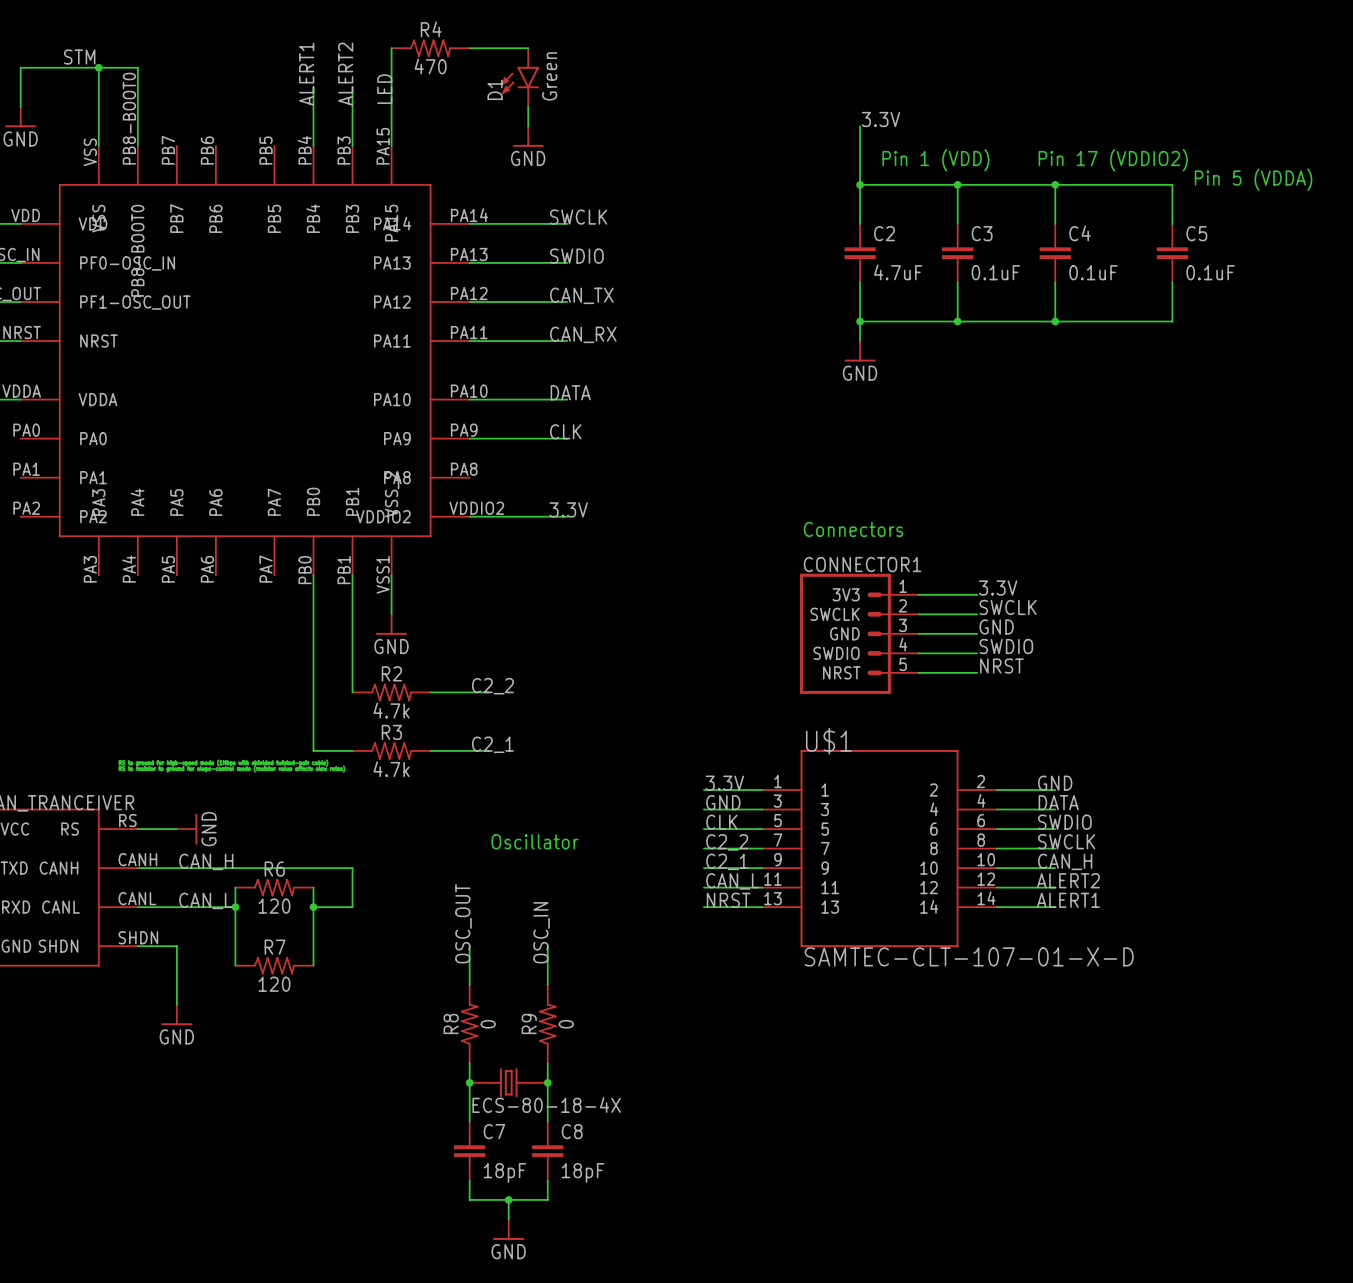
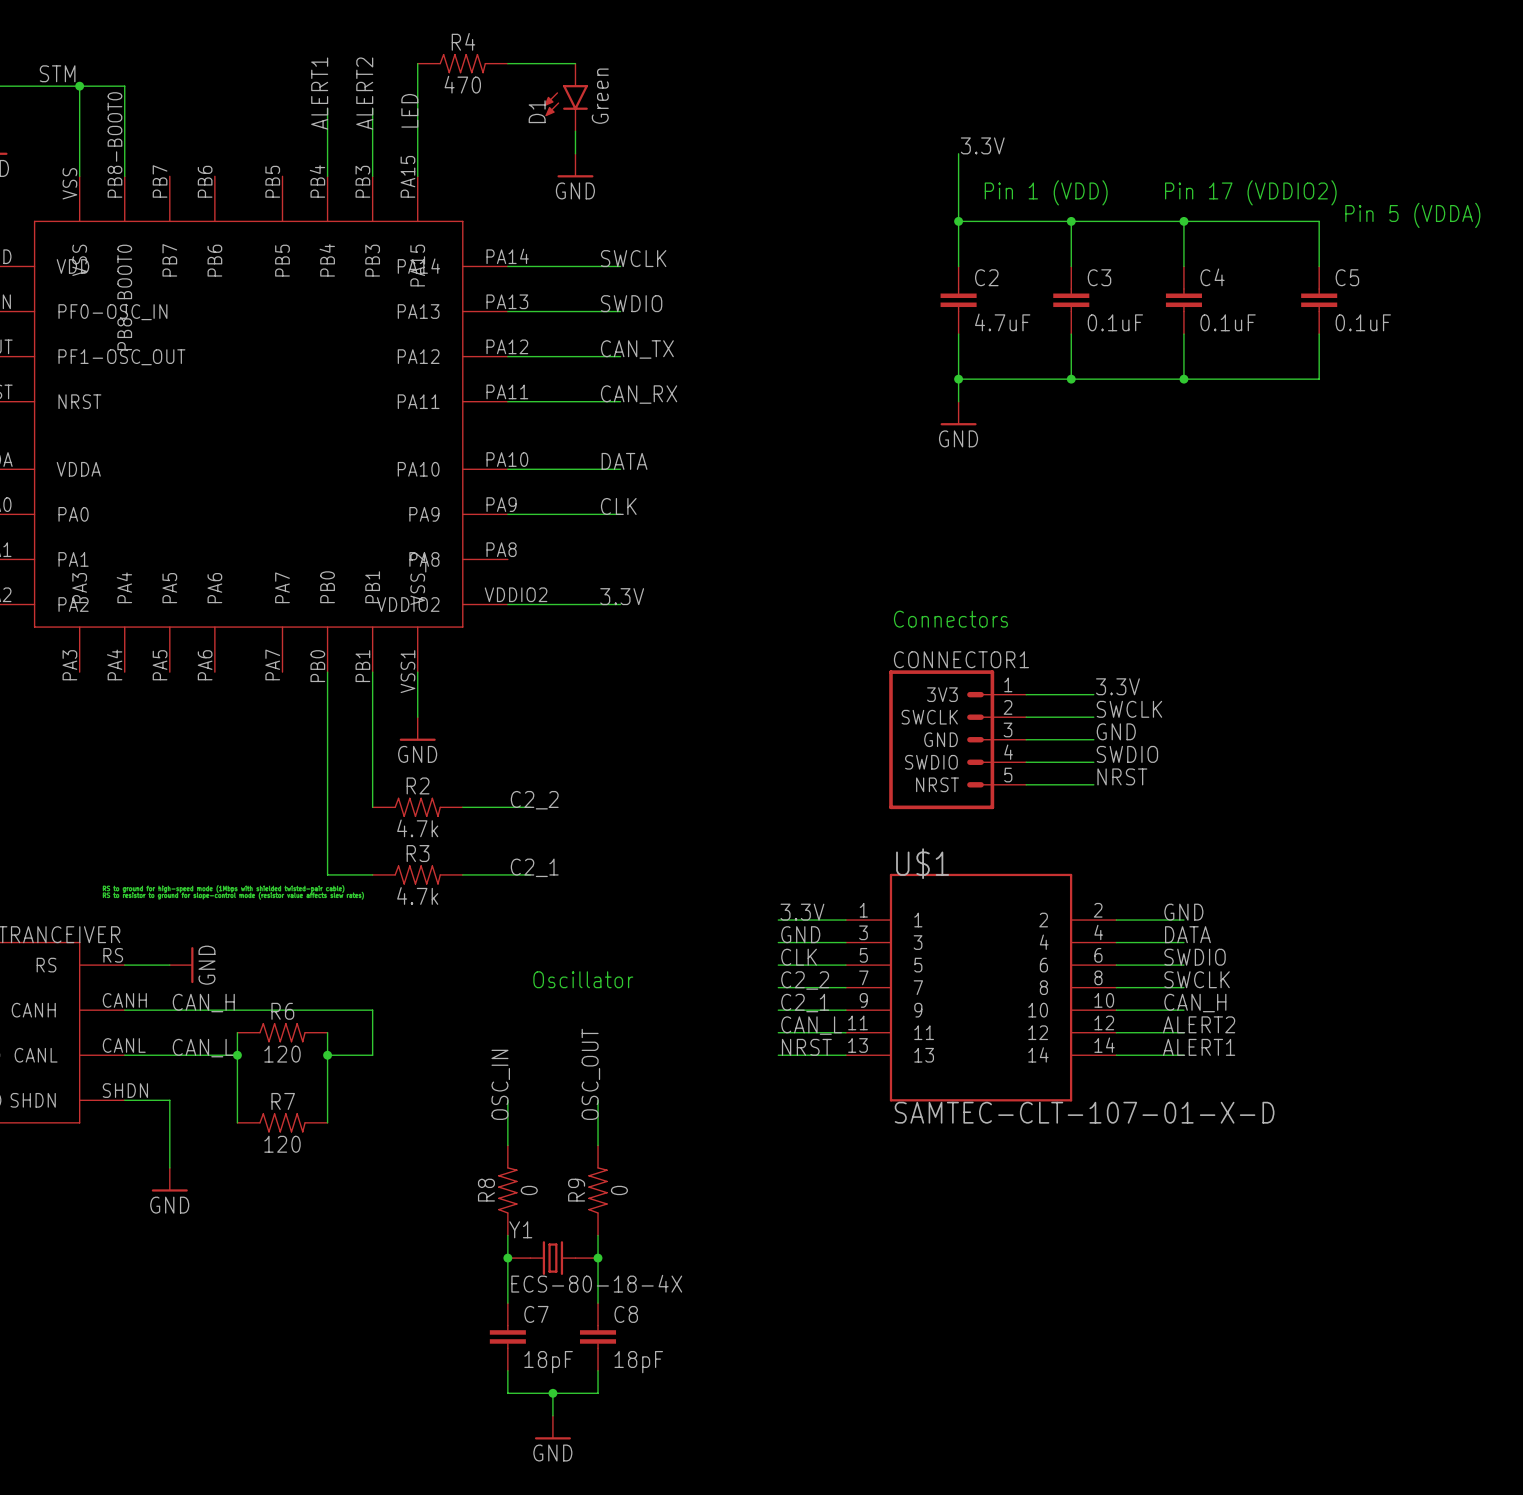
label: OSC_OUT (463, 923) -> OSC_IN (500, 1084)
label: OSC_IN (541, 932) -> OSC_OUT (590, 1074)
Y1 name: none -> Y1 (520, 1229)

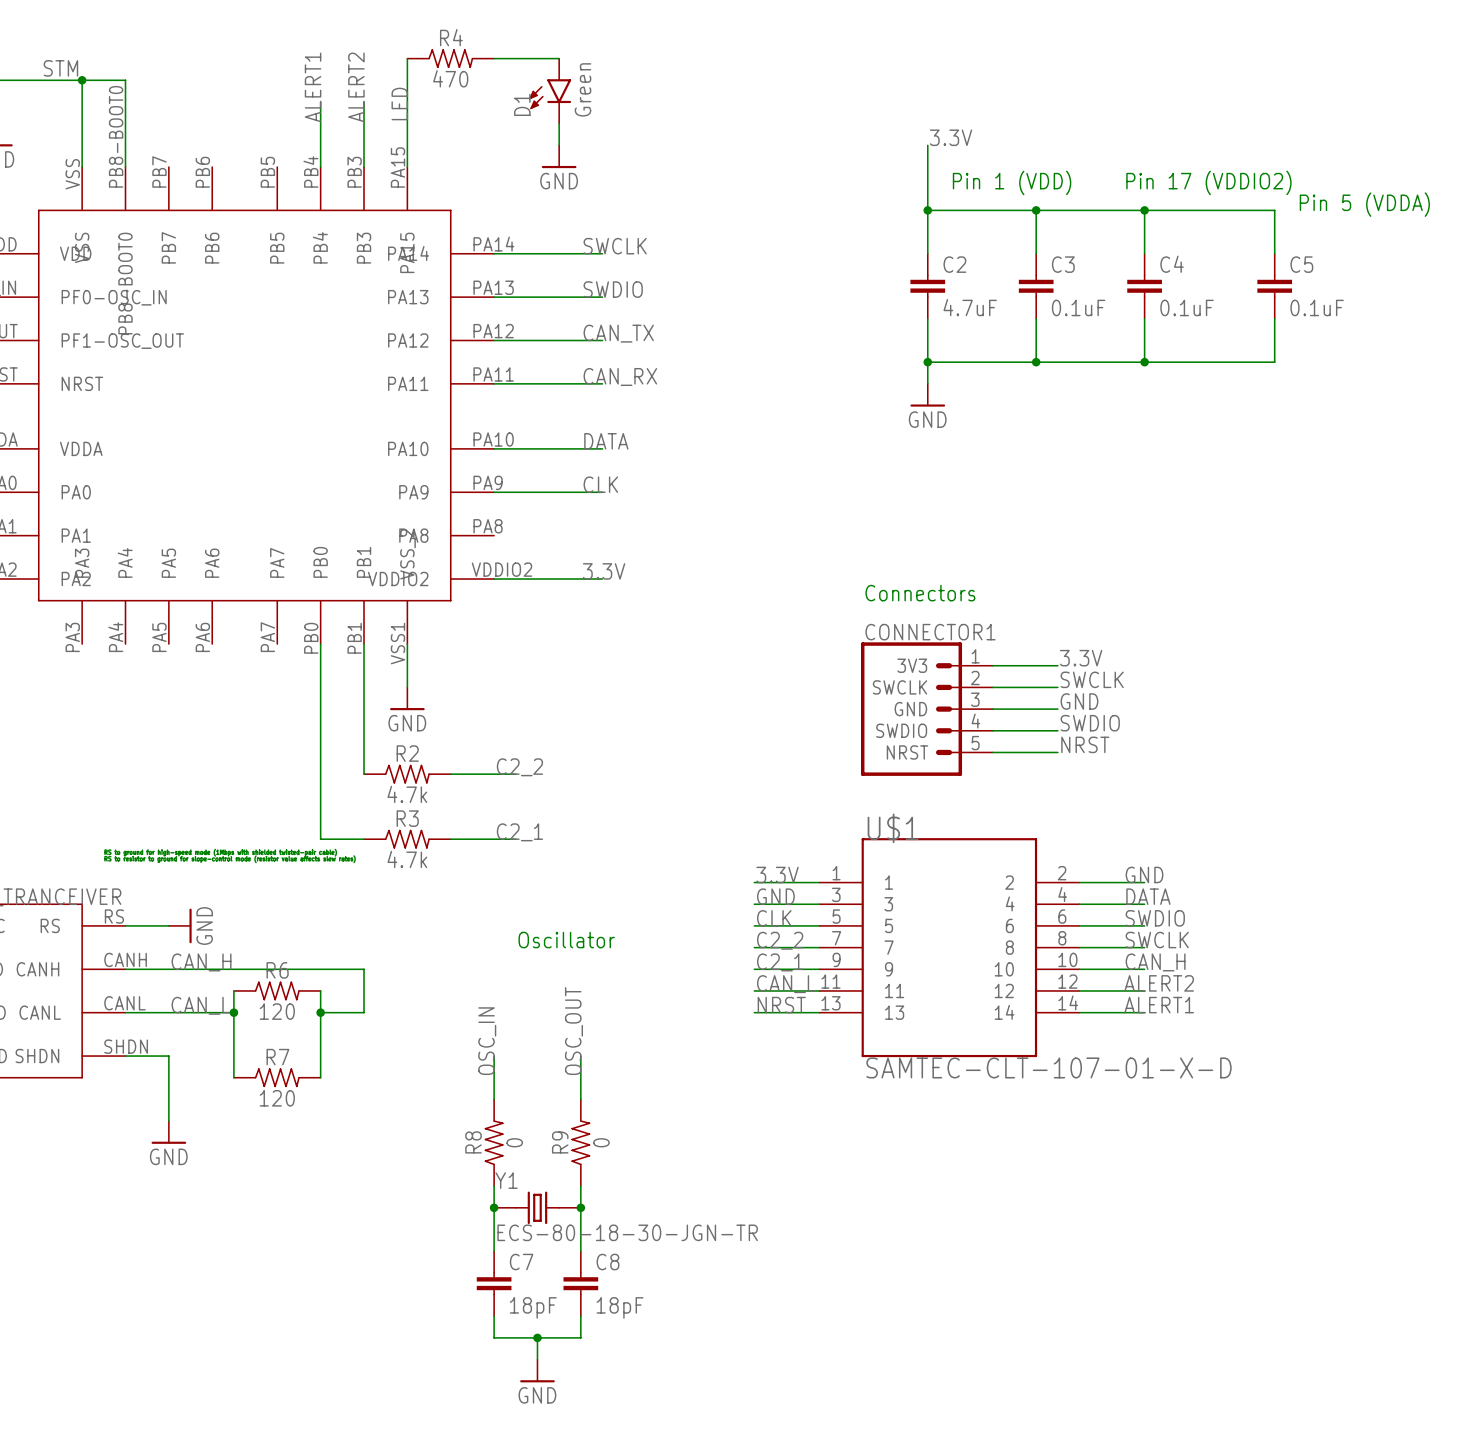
Y1 value: ECS-80-18-4X (596, 1283) -> ECS-80-18-30-JGN-TR (627, 1232)

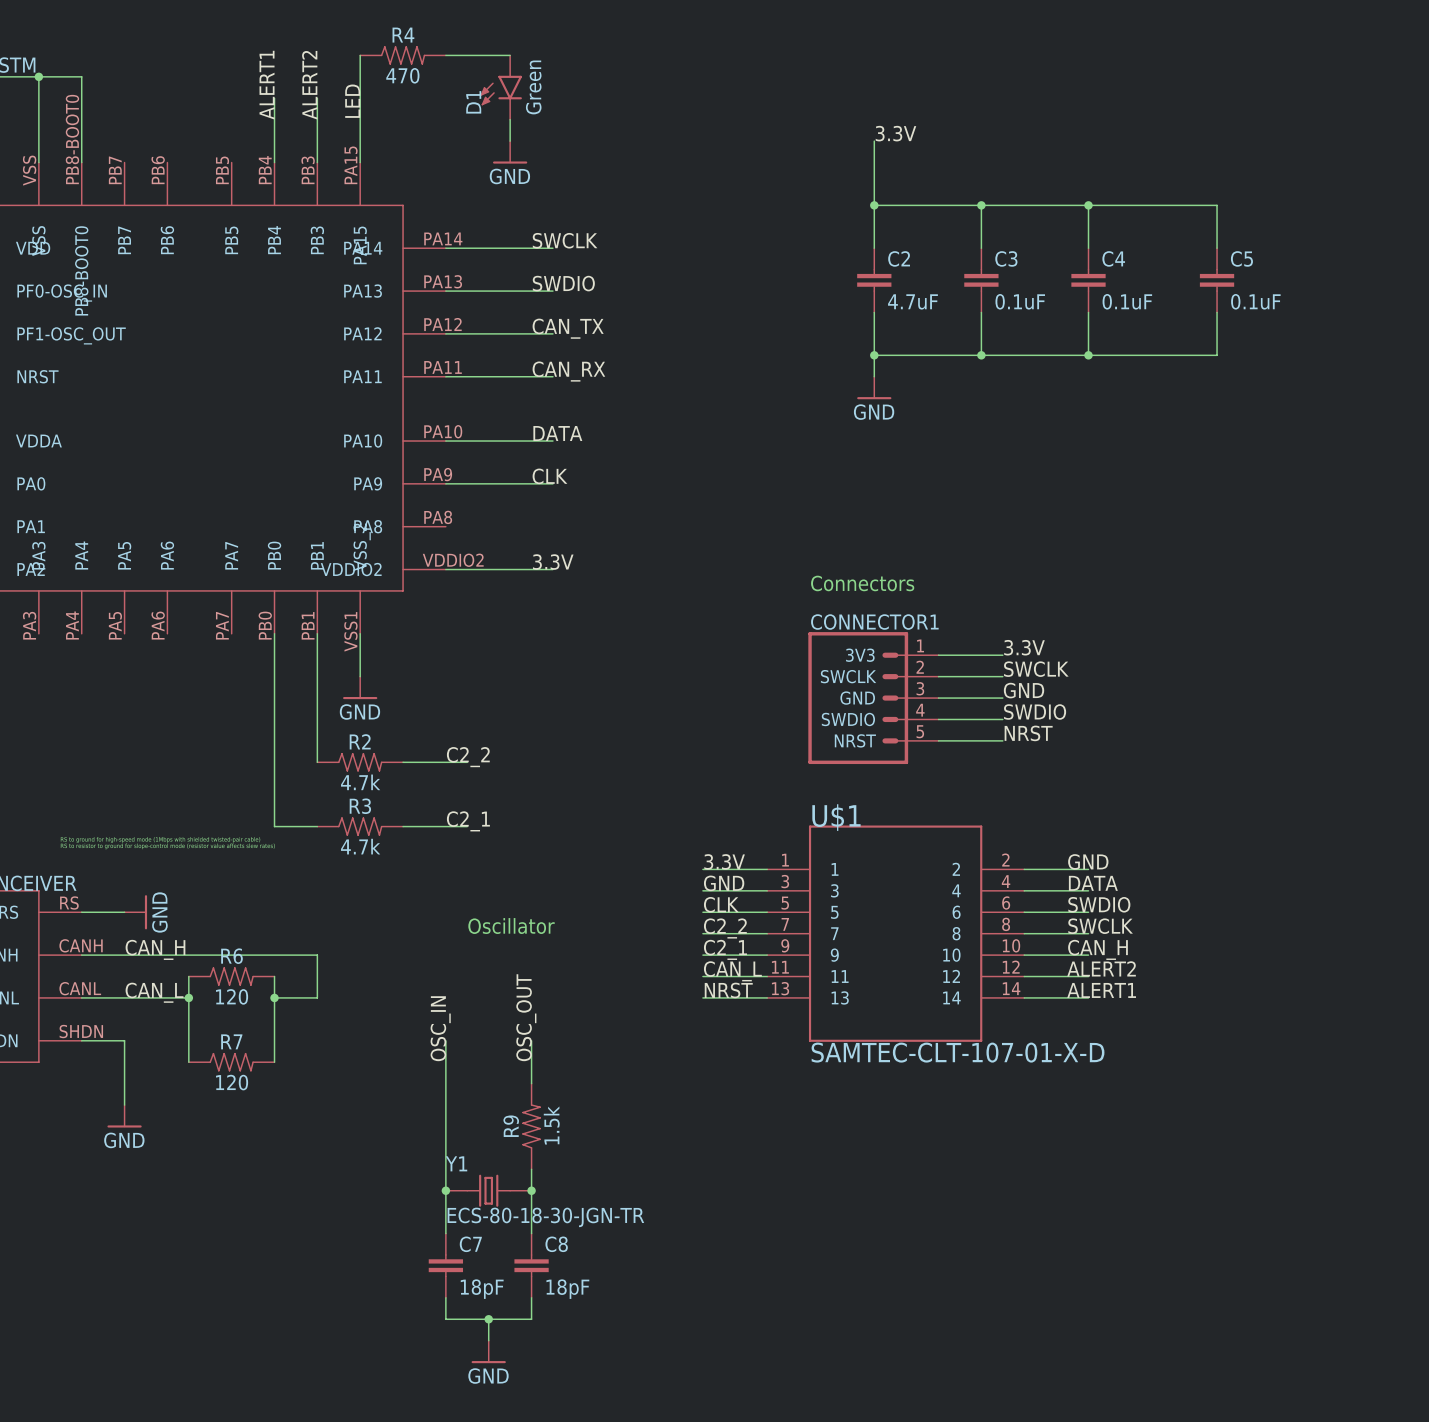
text: Pin 1 (VDD) (1012, 182) -> none
text: Pin 17 (VDDIO2) (1208, 182) -> none
text: Pin 5 (VDDA) (1364, 204) -> none
R8: 0 (494, 1142) -> none
R9 value: 0 (601, 1142) -> 1.5k (551, 1125)

